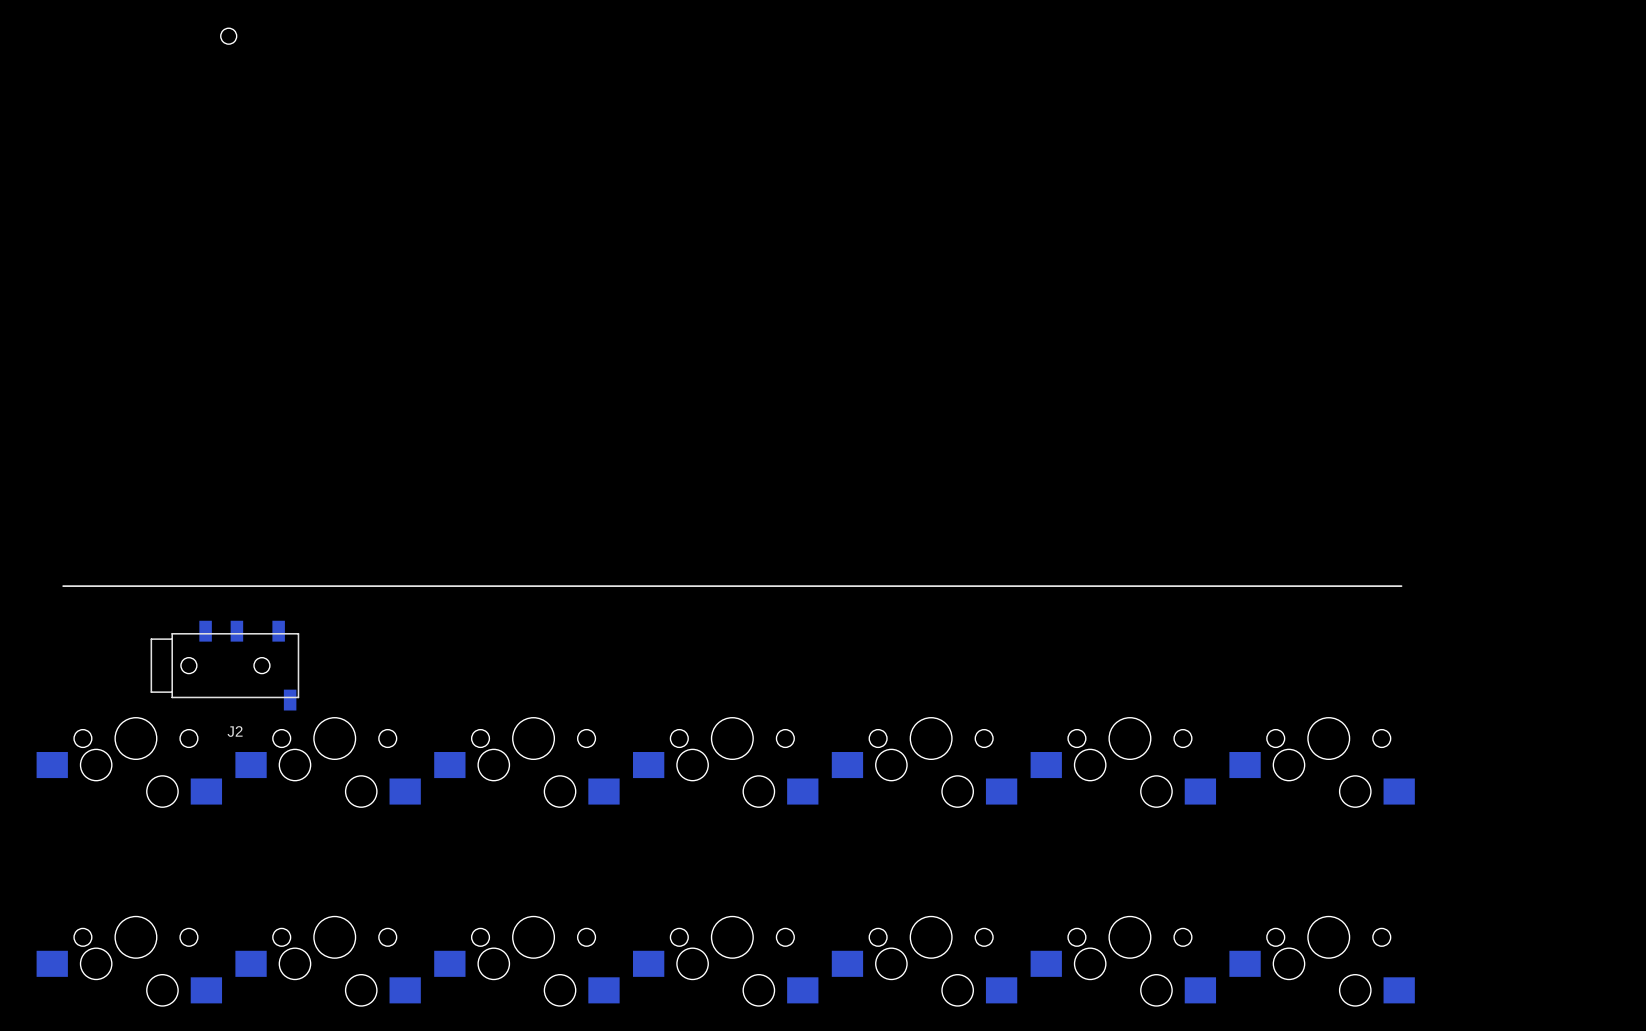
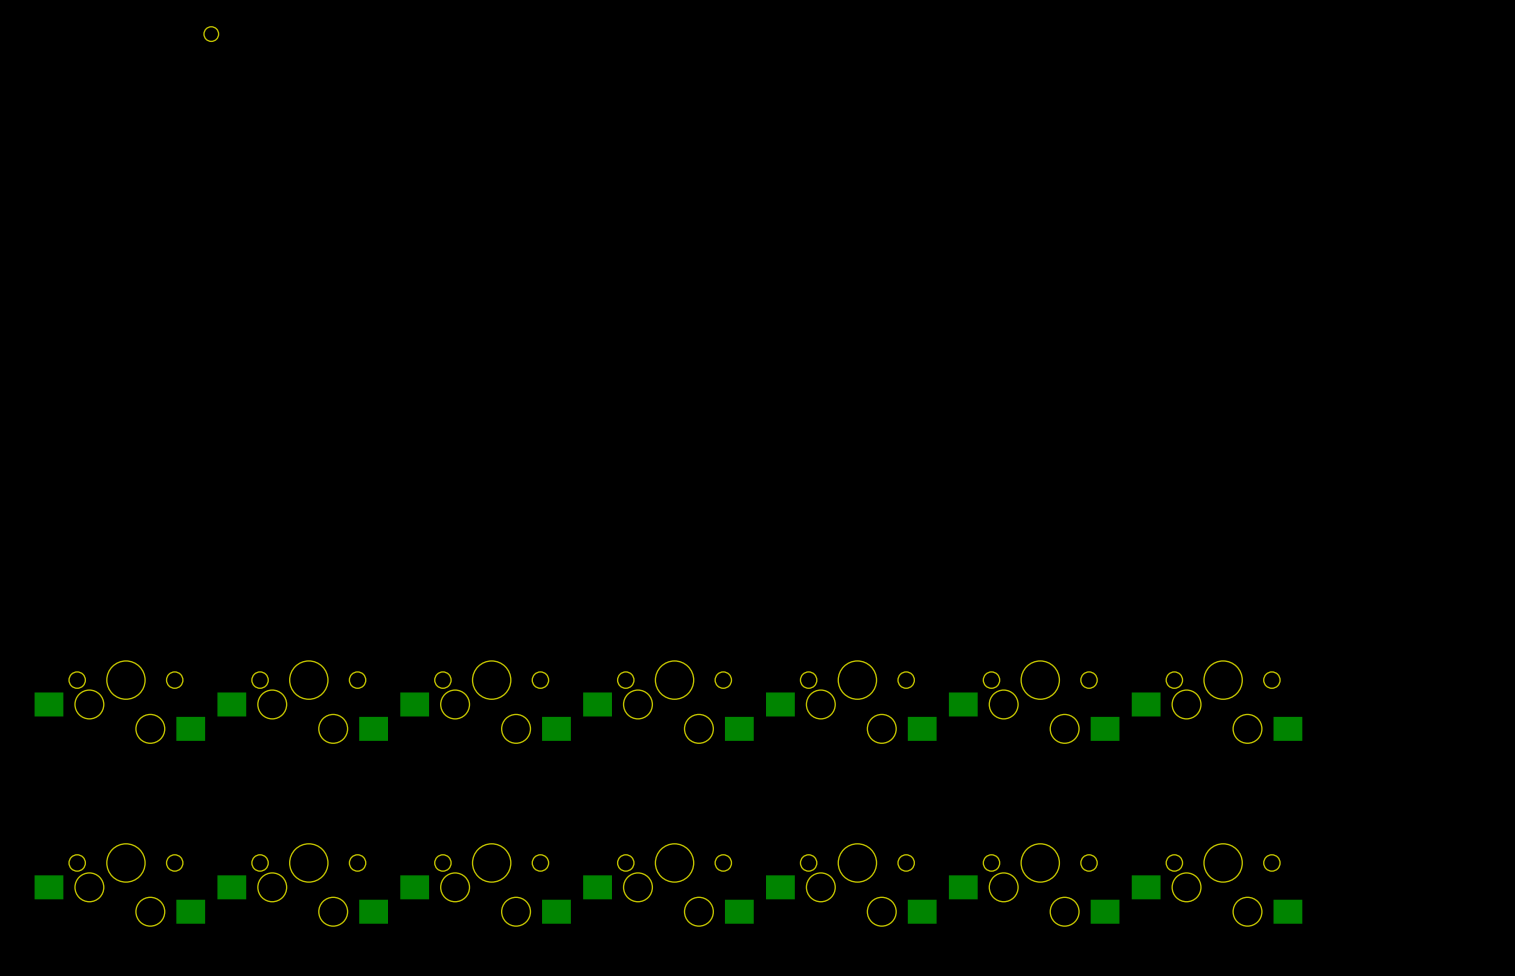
board edge: (1401, 586) (63, 586) -> none
J2: (224, 665) -> none

